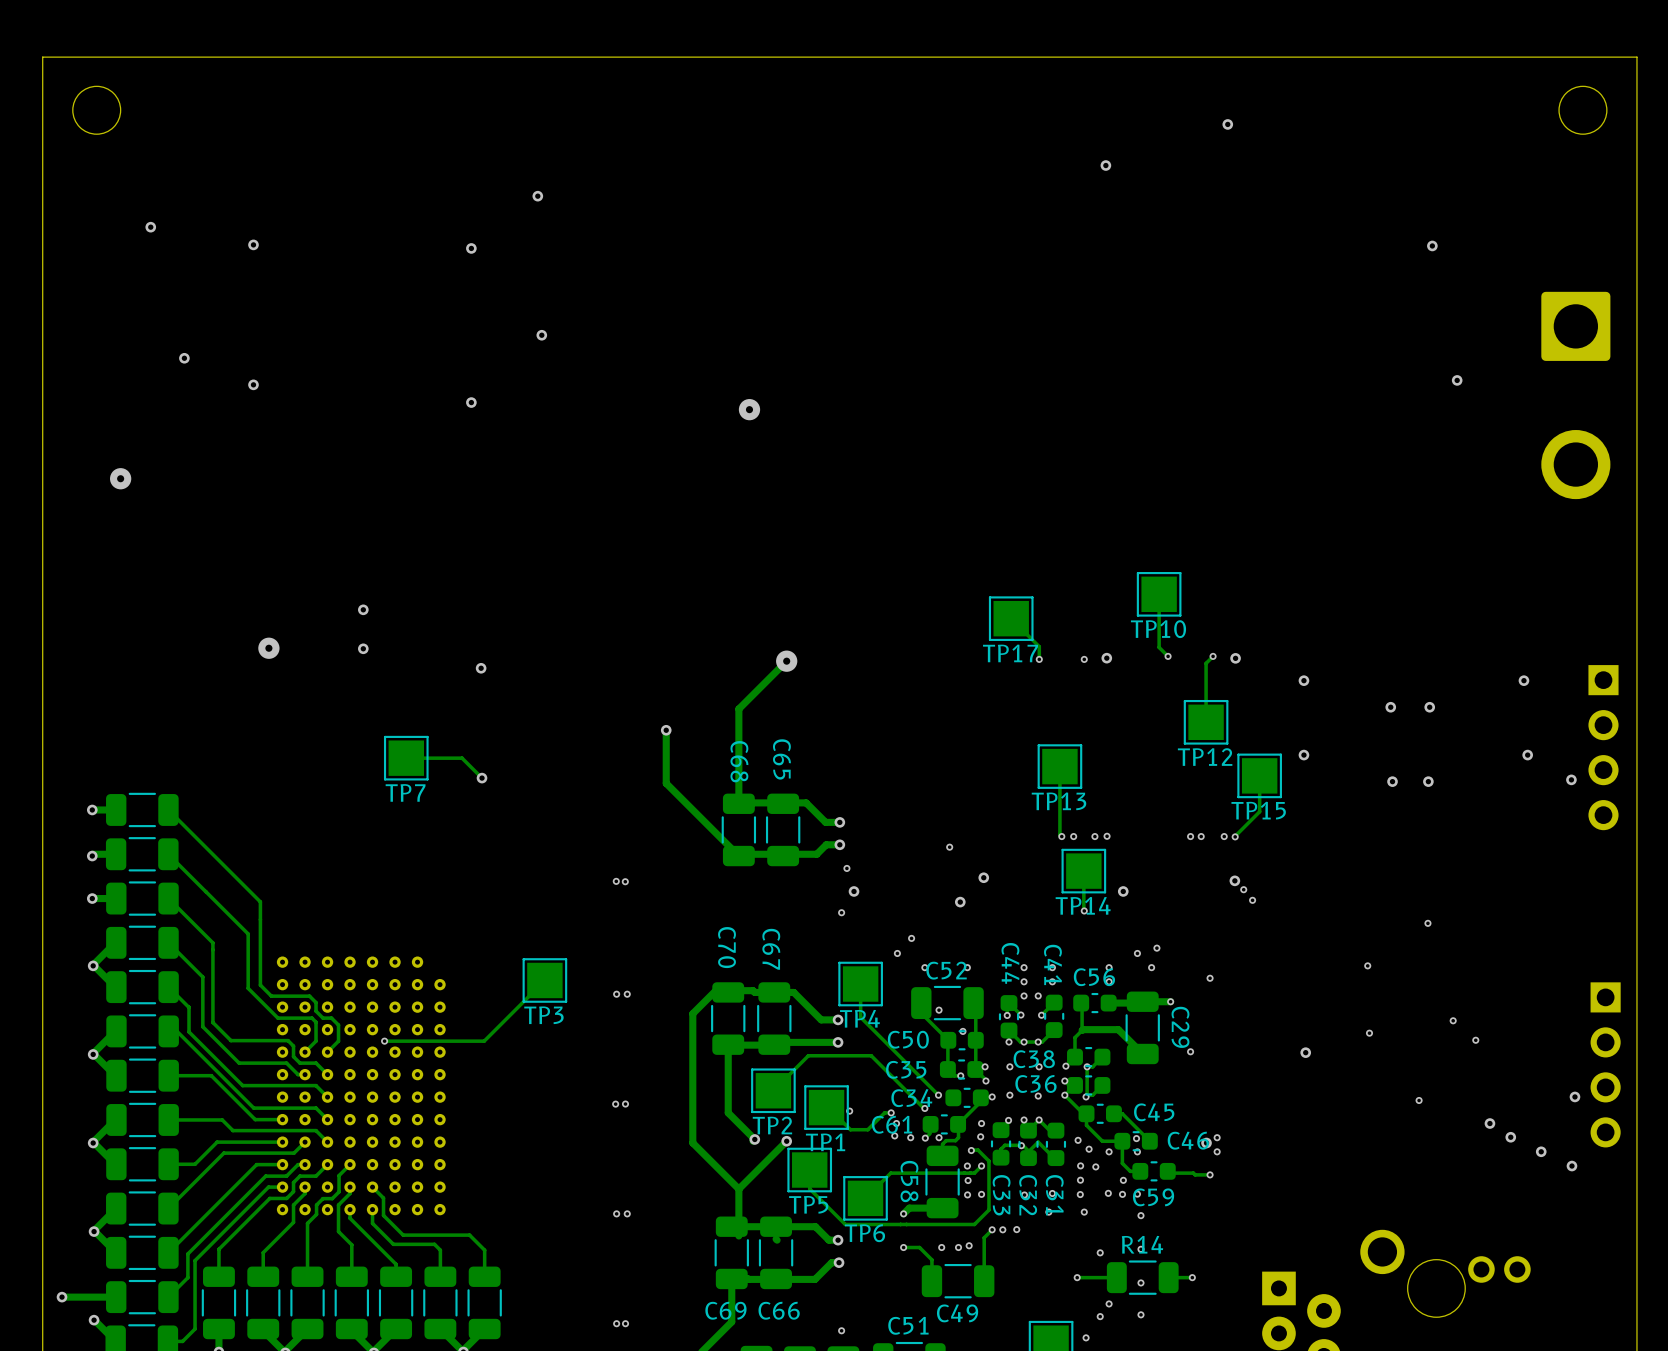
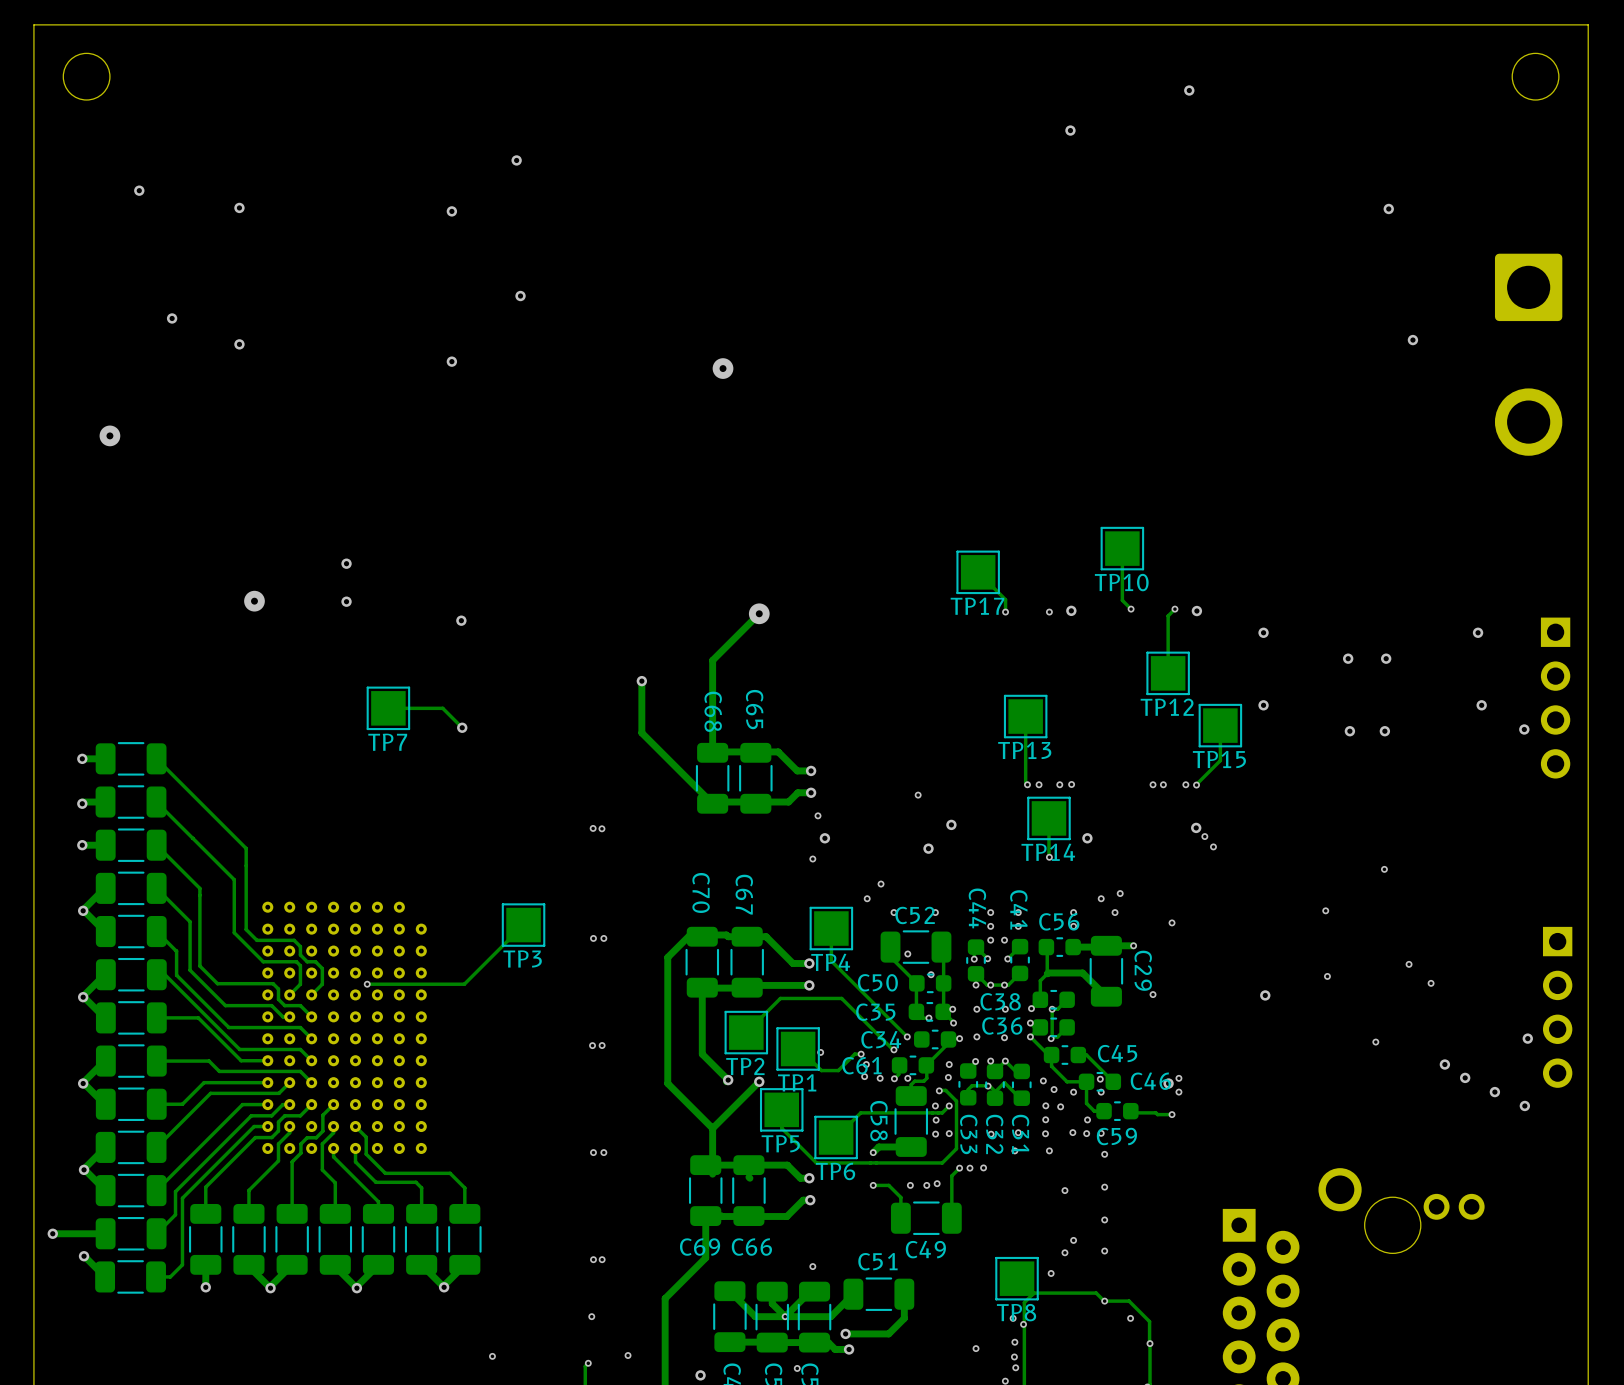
via: (1077, 1277) -> none
track: (1116, 1277) (1077, 1277) -> none
R14: (1142, 1277) -> none
track: (1192, 1277) (1168, 1277) -> none
via: (1192, 1277) -> none

